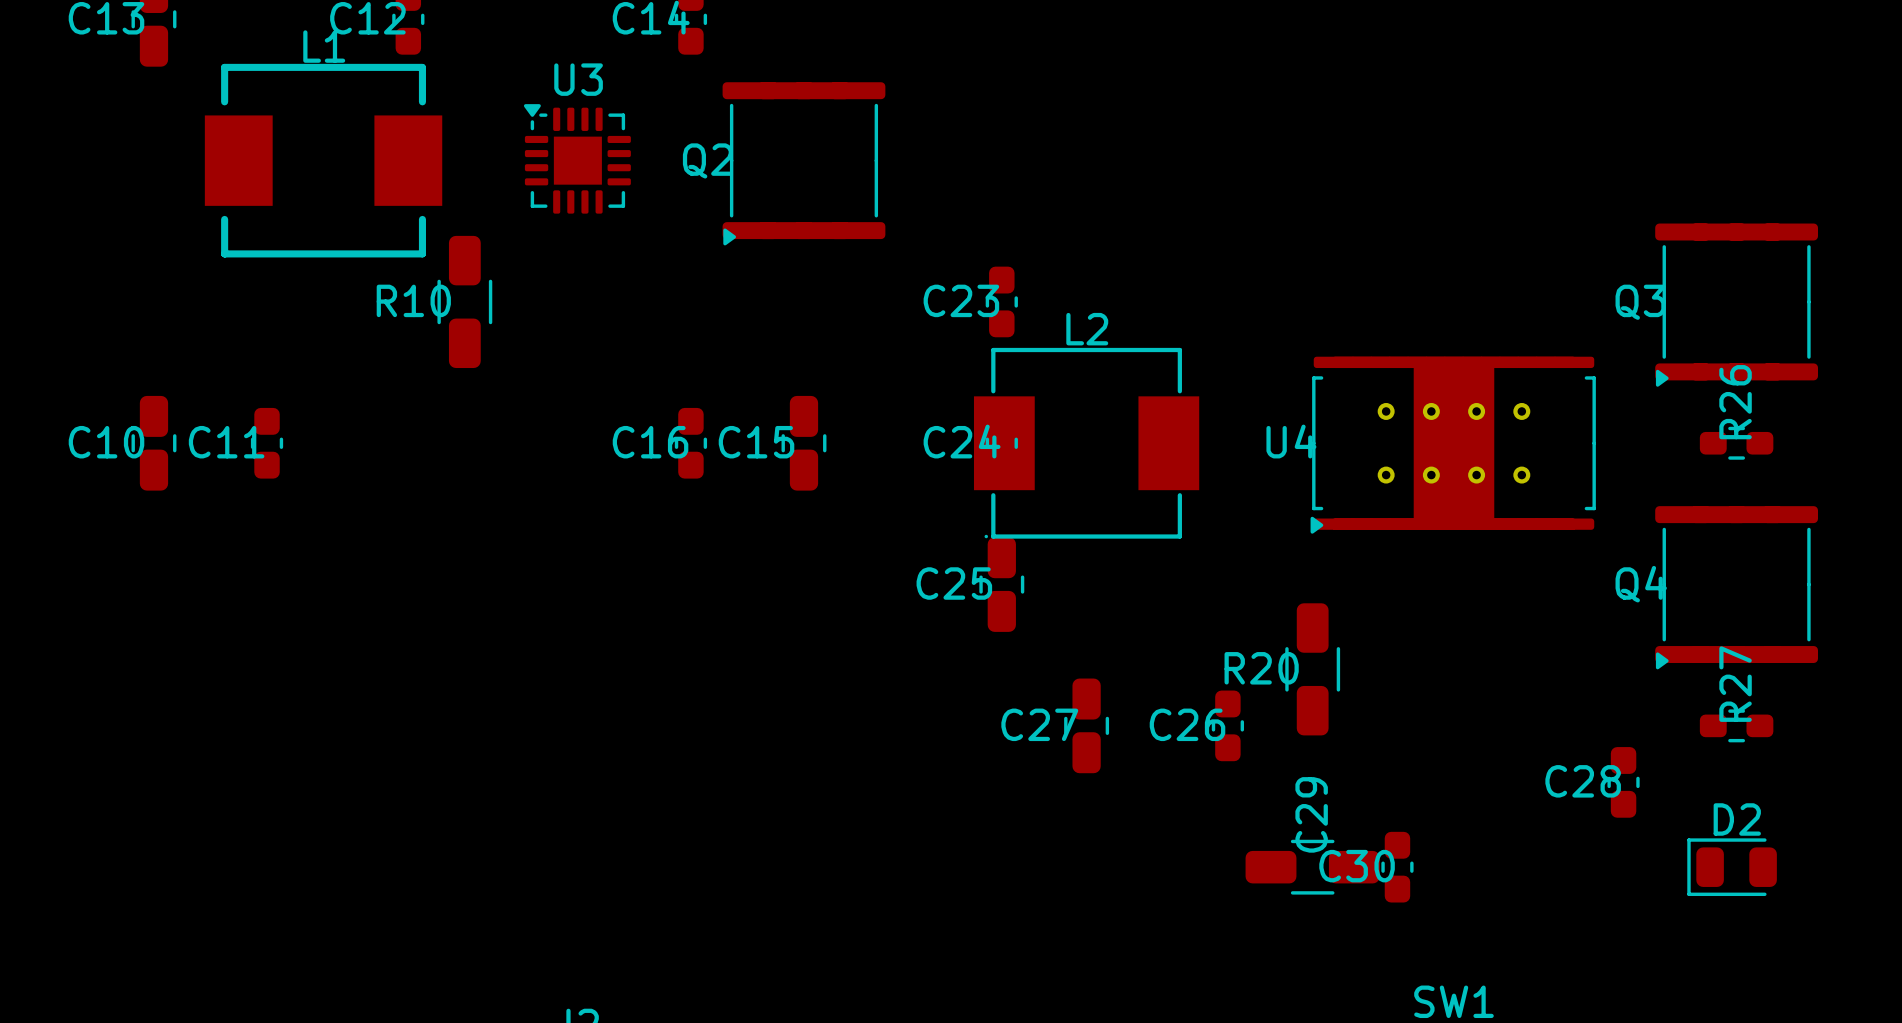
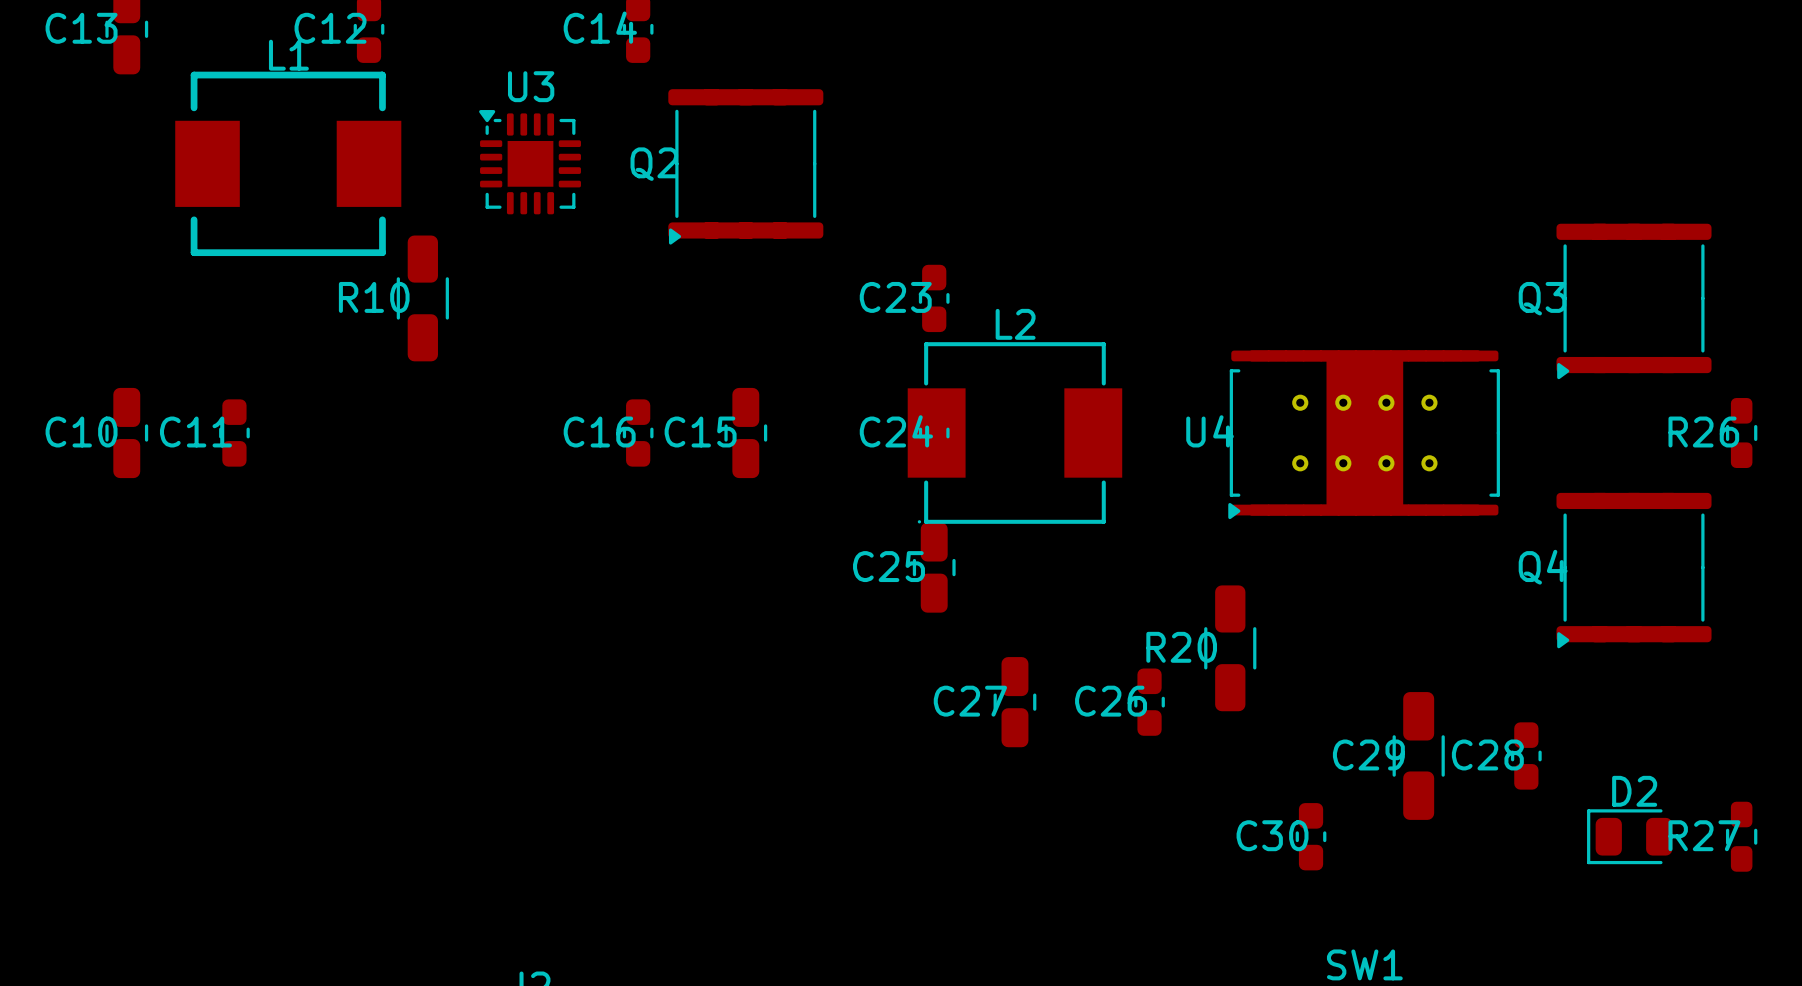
R26 name position: R26 (1735, 402) -> R26 (1703, 431)
R26 rotation: 0° (1736, 443) -> 90° clockwise (1741, 433)
R26 position: (1736, 443) -> (1741, 433)
R27 name position: R27 (1735, 684) -> R27 (1704, 835)
R27 rotation: 0° (1736, 725) -> 90° clockwise (1741, 836)
R27 position: (1736, 725) -> (1741, 836)
C29 name position: C29 (1311, 814) -> C29 (1368, 754)
C29 rotation: 0° (1312, 867) -> 90° clockwise (1418, 755)
C29 position: (1312, 867) -> (1418, 755)

